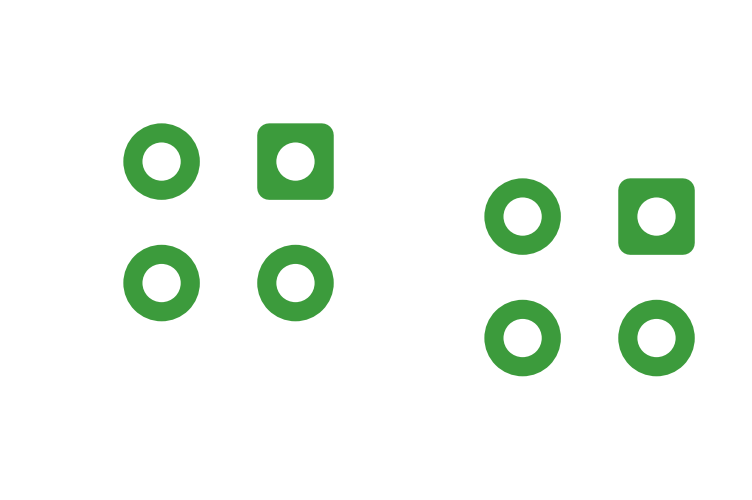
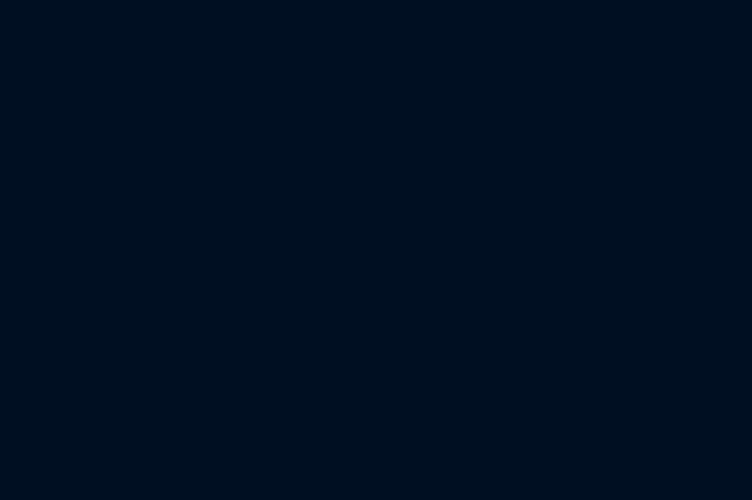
part: (228, 222) -> none
part: (589, 277) -> none

